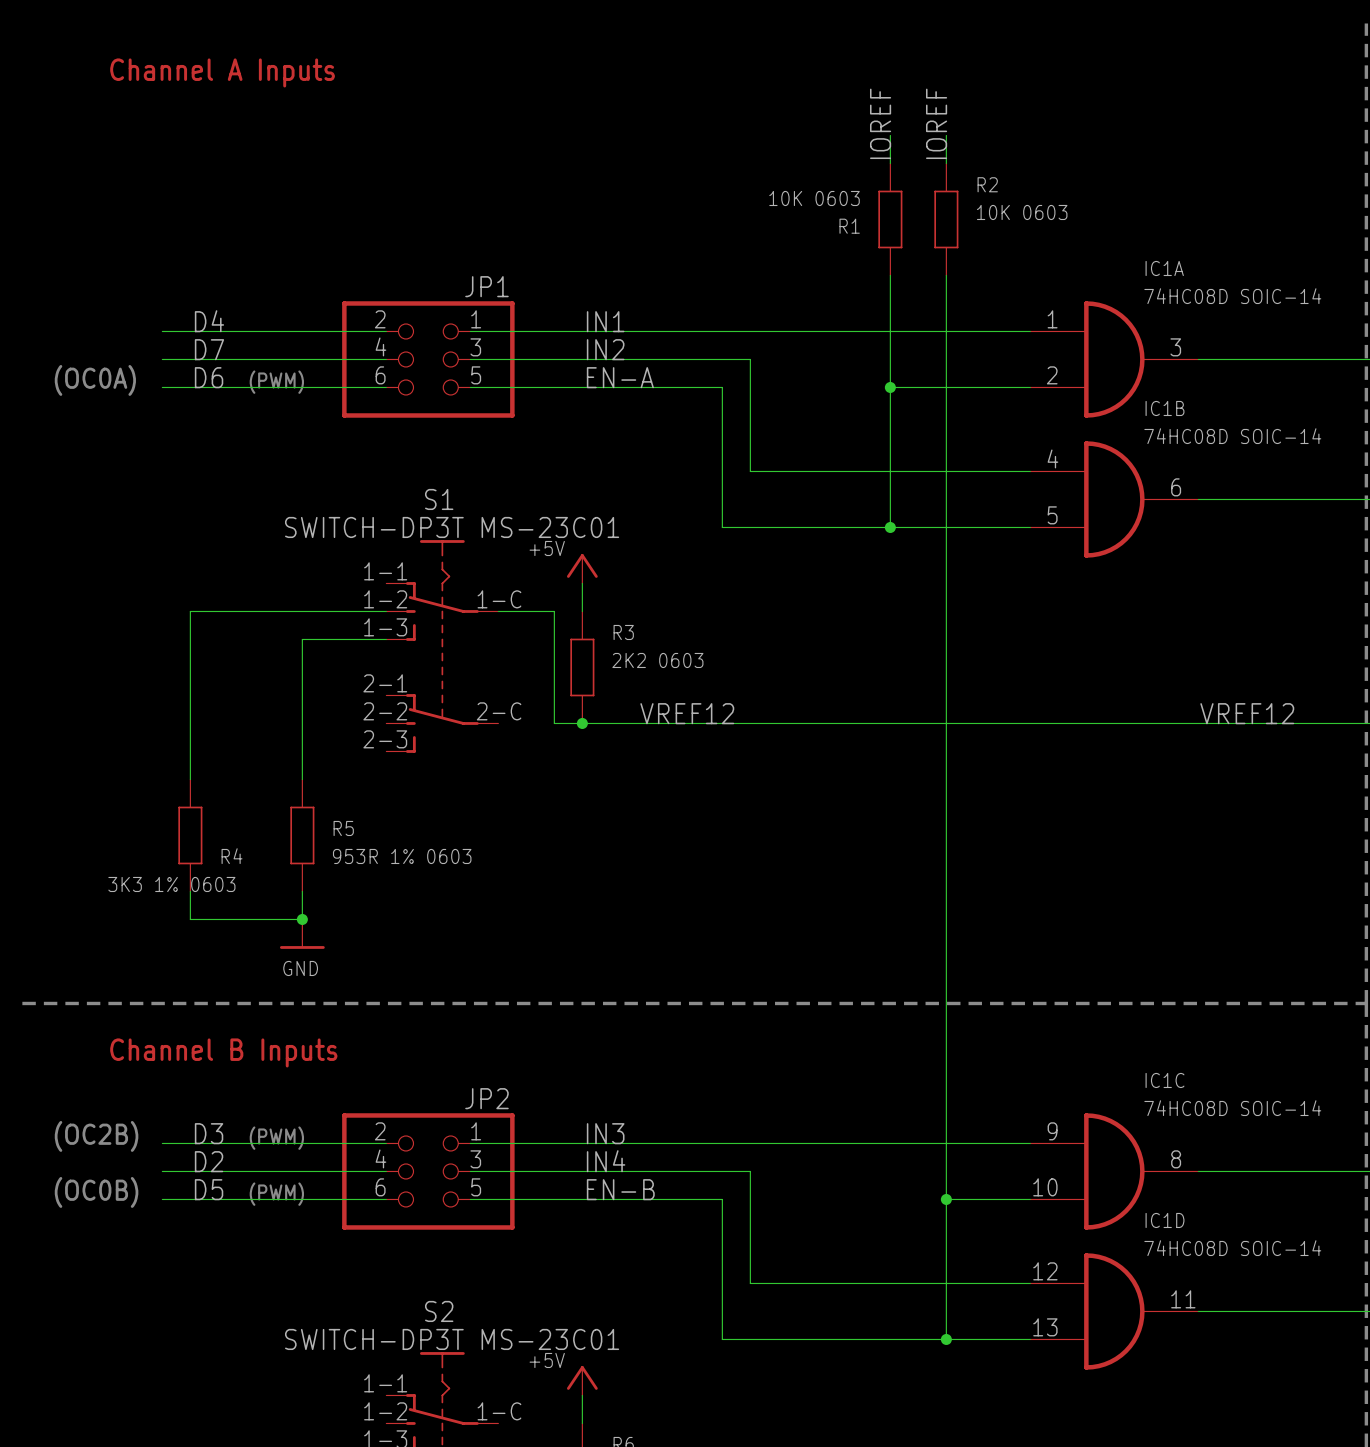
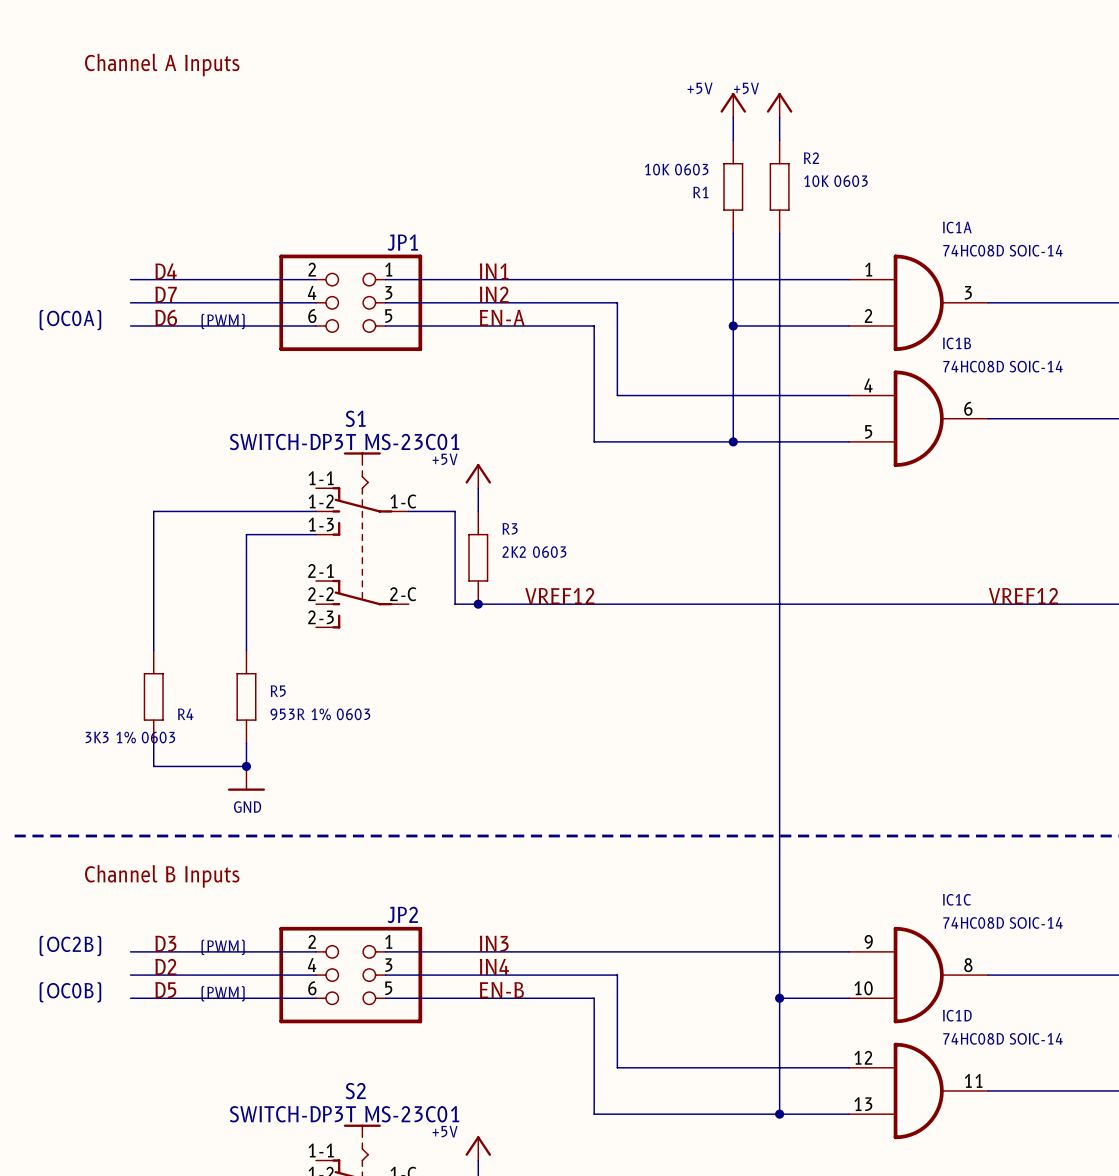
power symbol: none -> +5V (733, 105)
power symbol: none -> +5V (779, 105)
label: IOREF (880, 123) -> none
label: IOREF (936, 123) -> none

